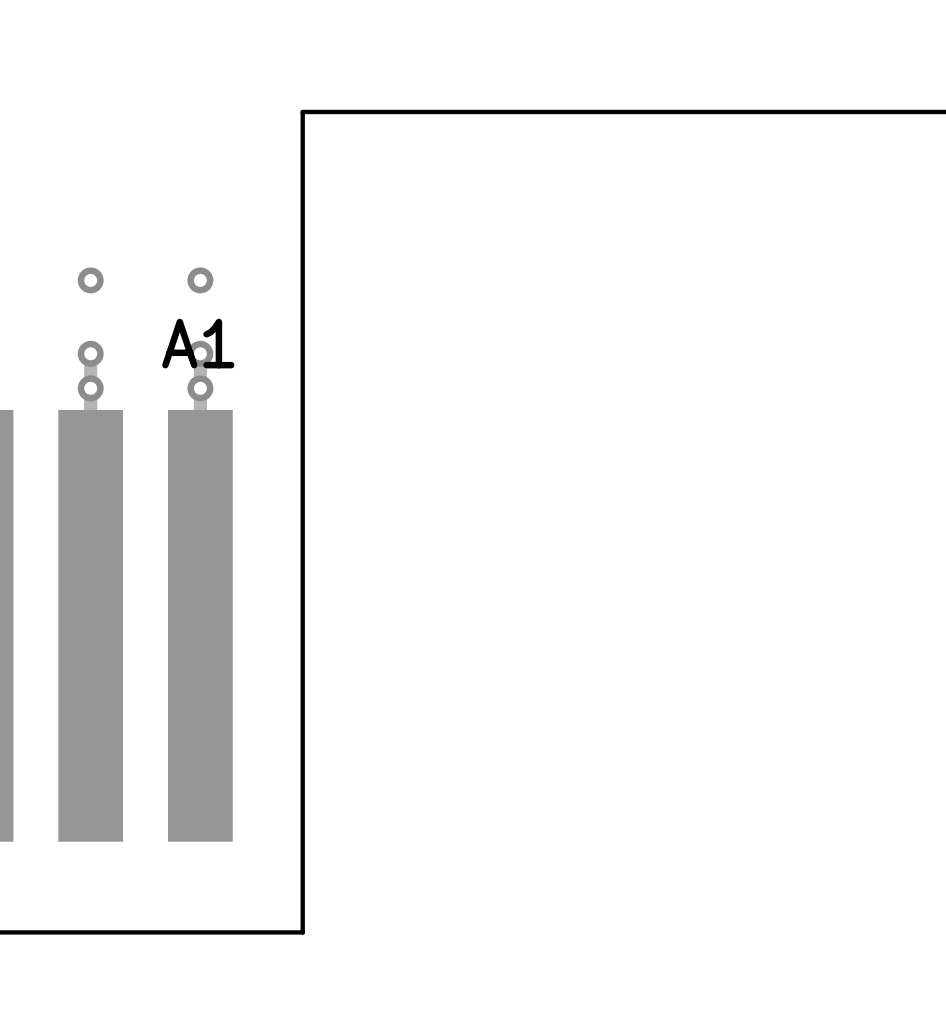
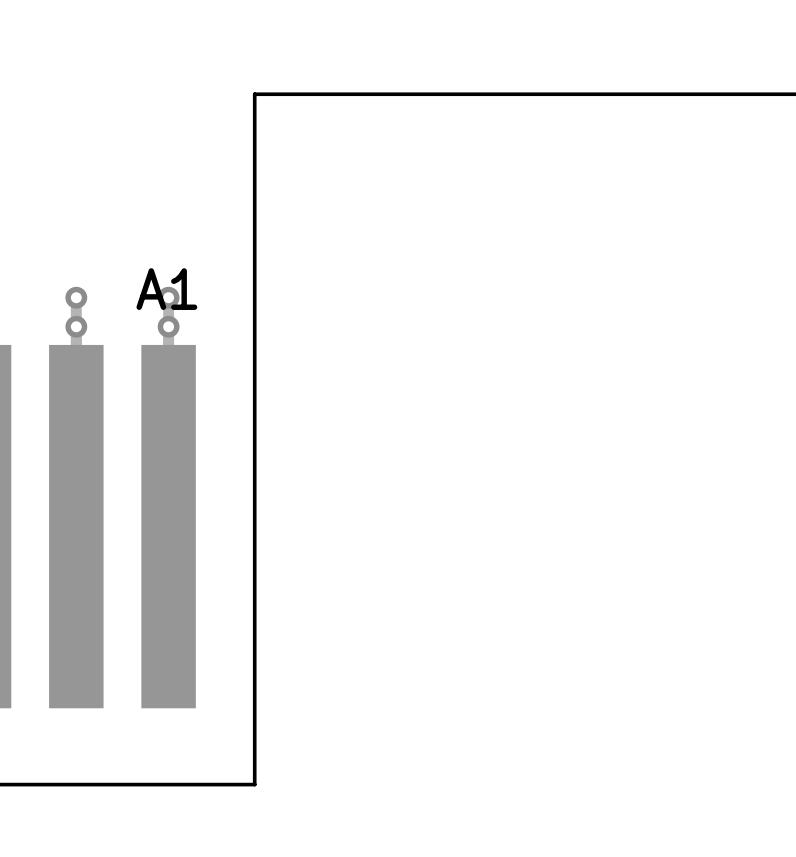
via: (90, 280) -> none
via: (200, 280) -> none

